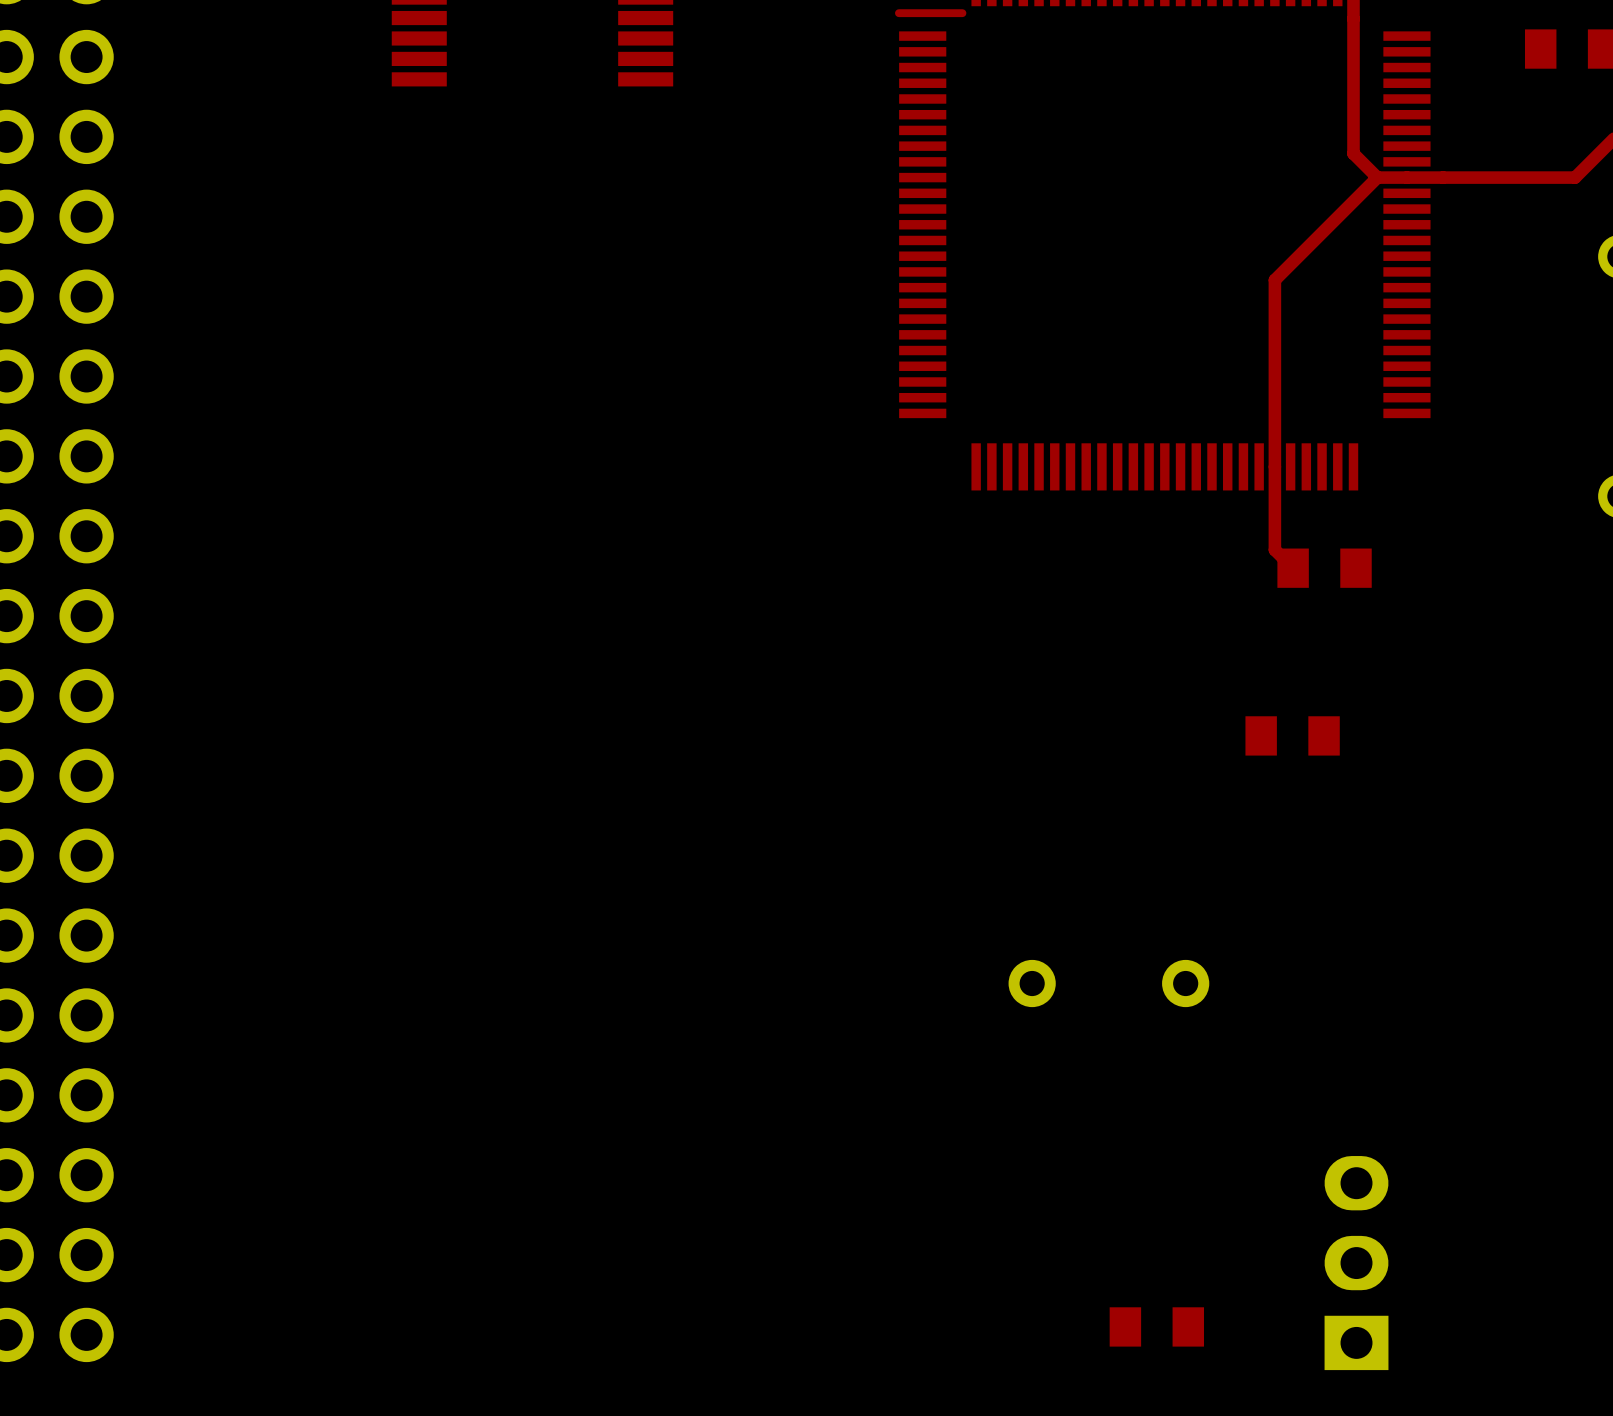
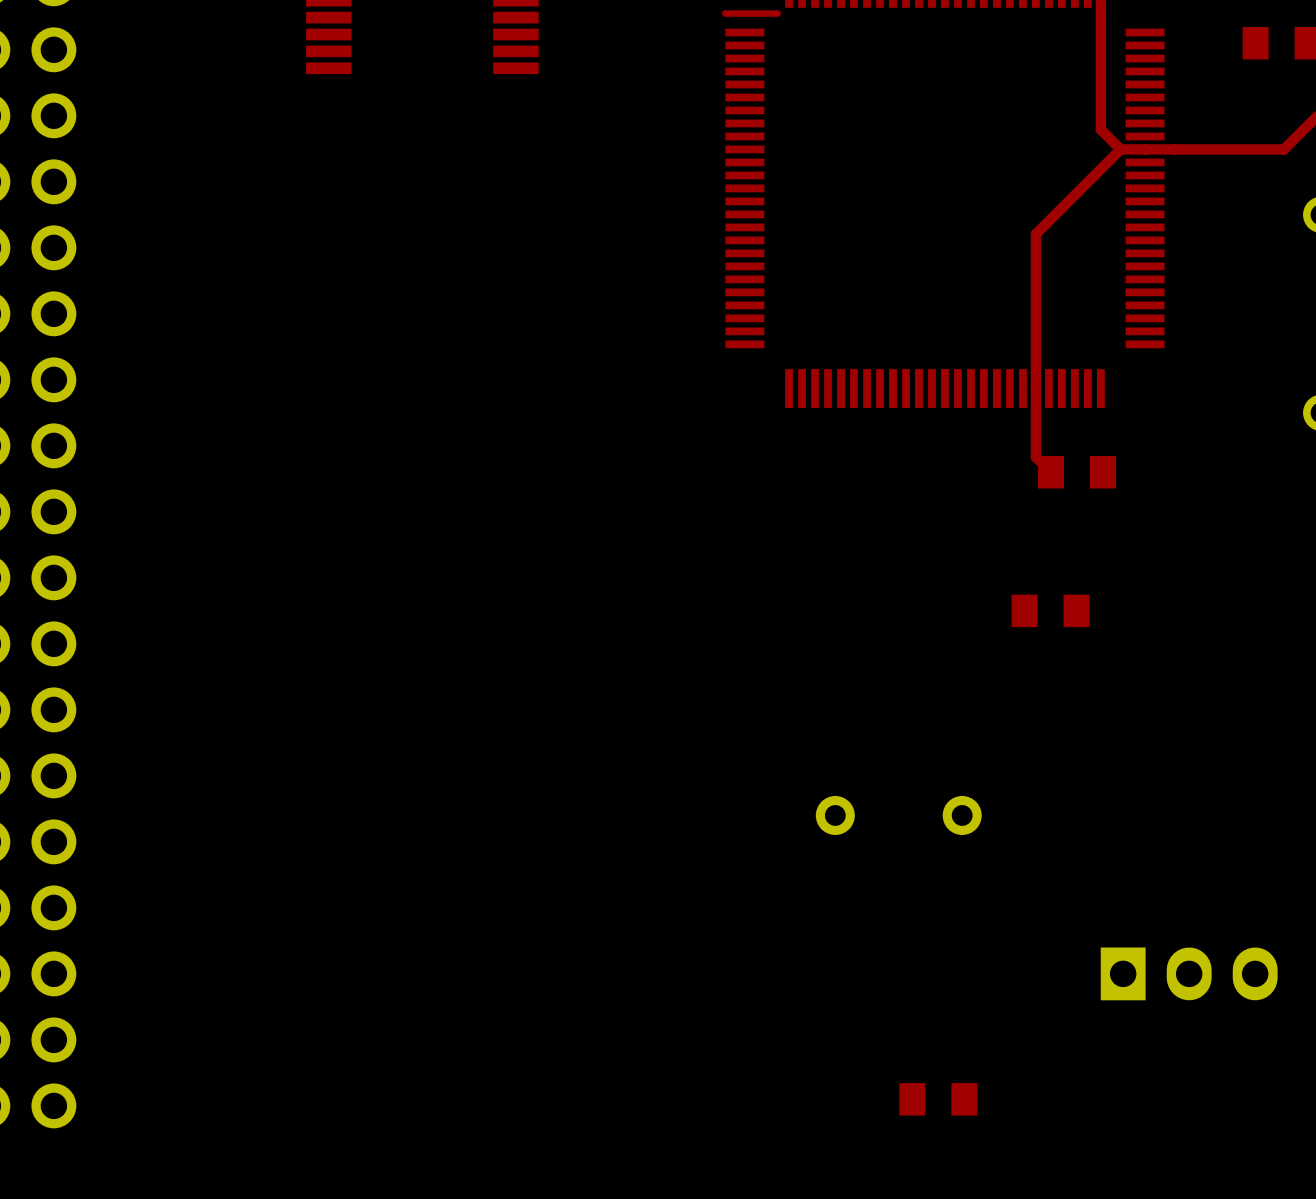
part rotation: 0° (1356, 1263) -> 90° clockwise (1189, 973)
part position: (1356, 1263) -> (1189, 973)

